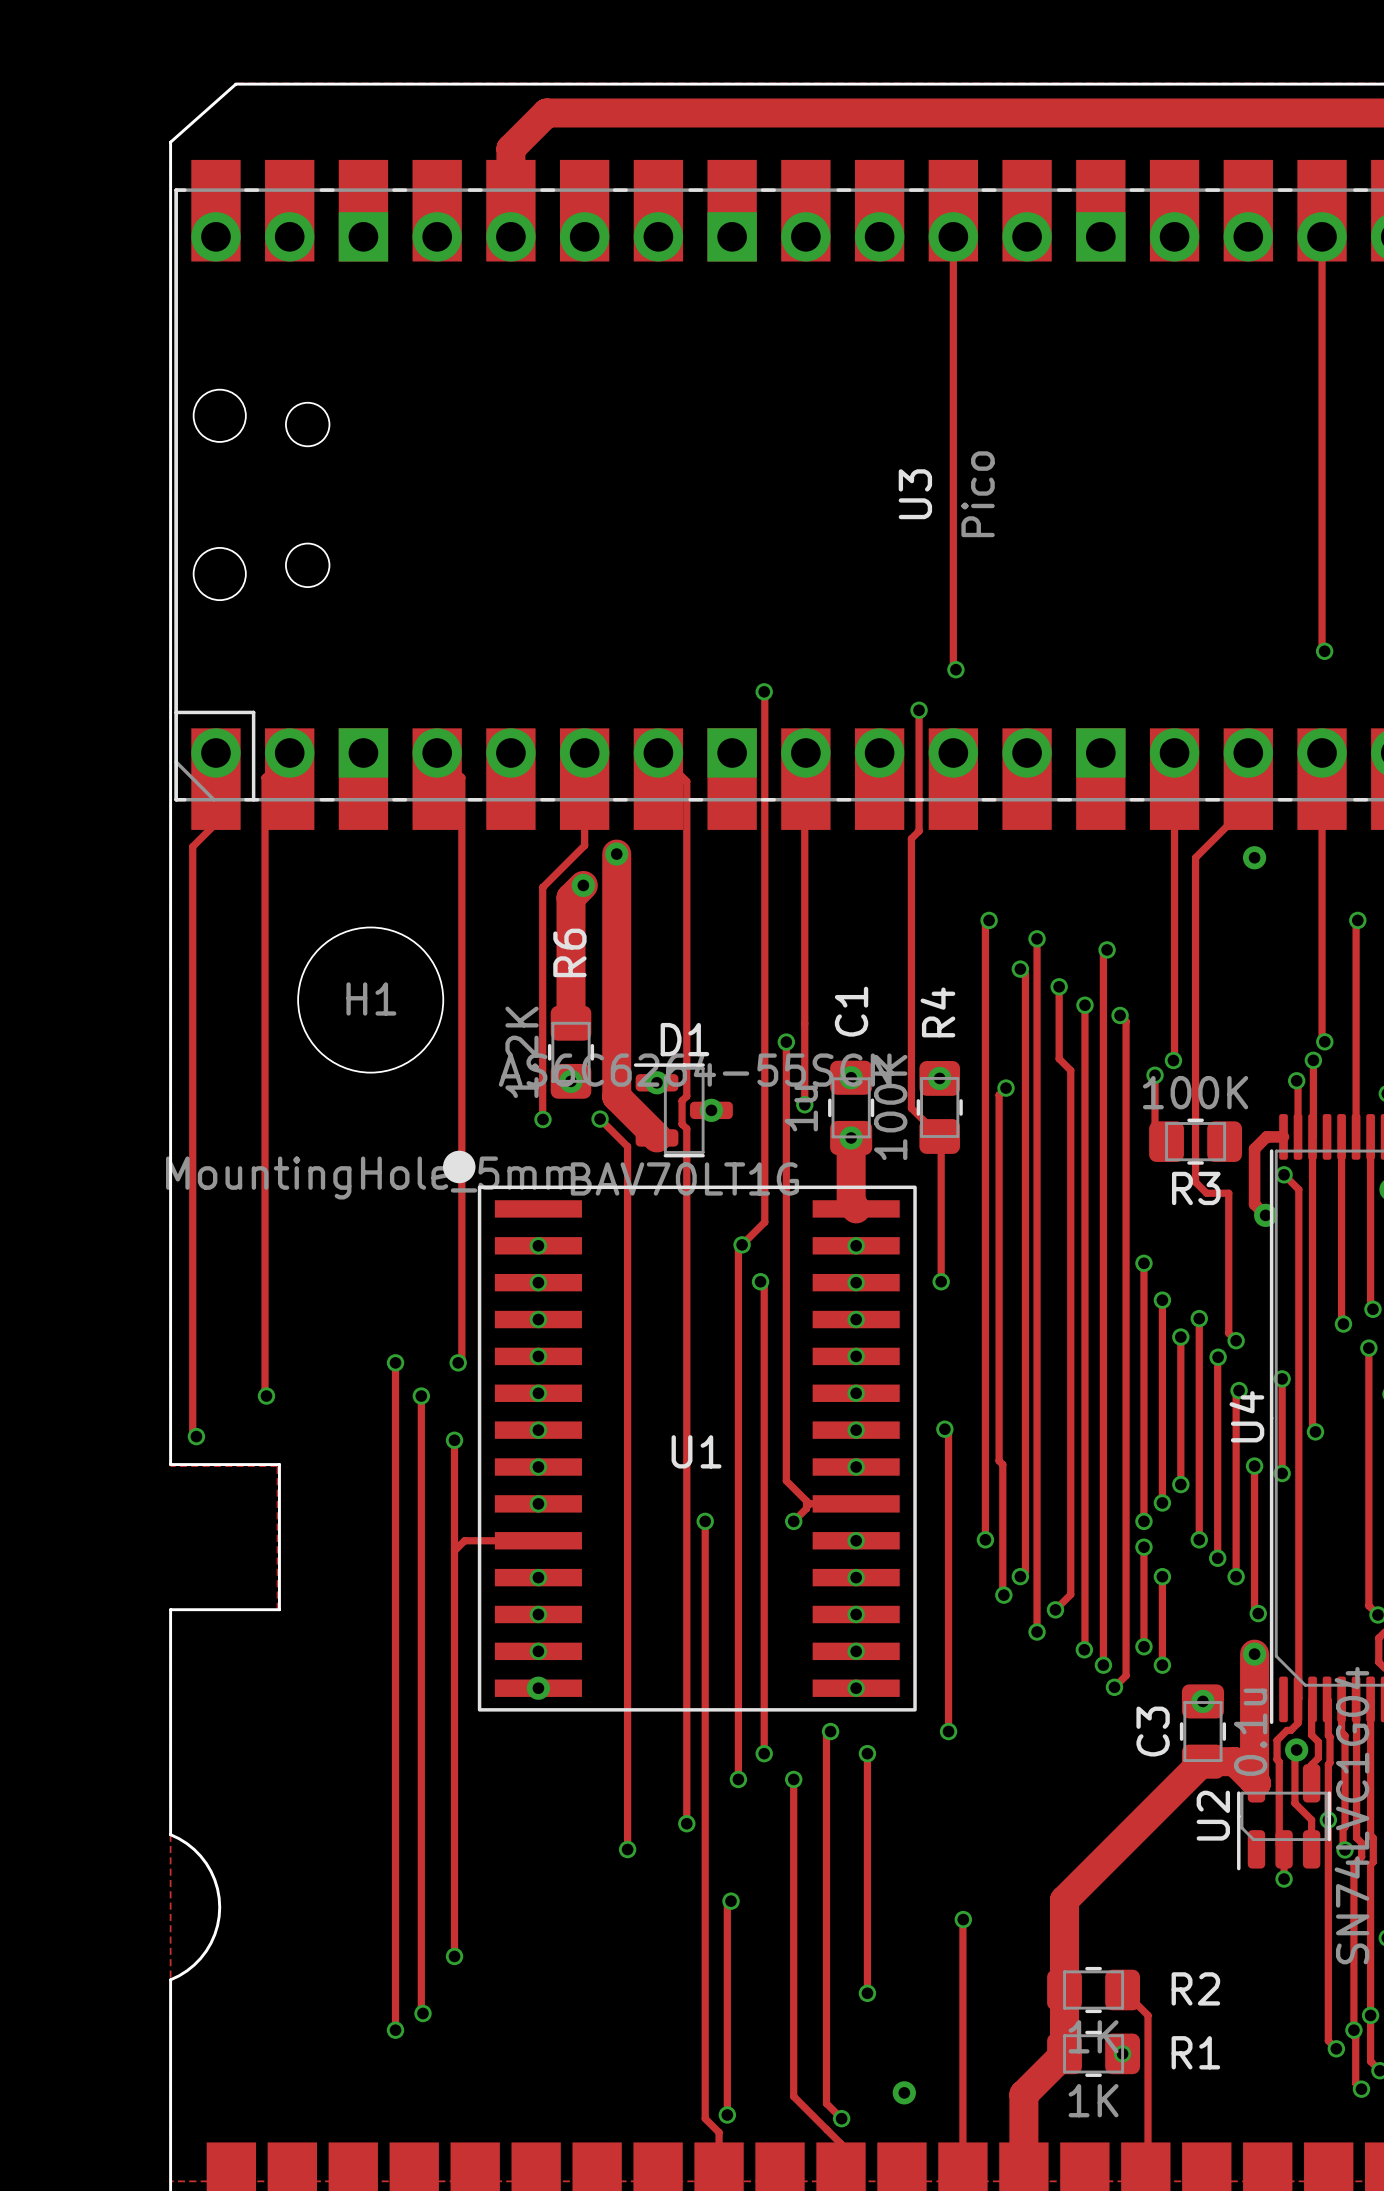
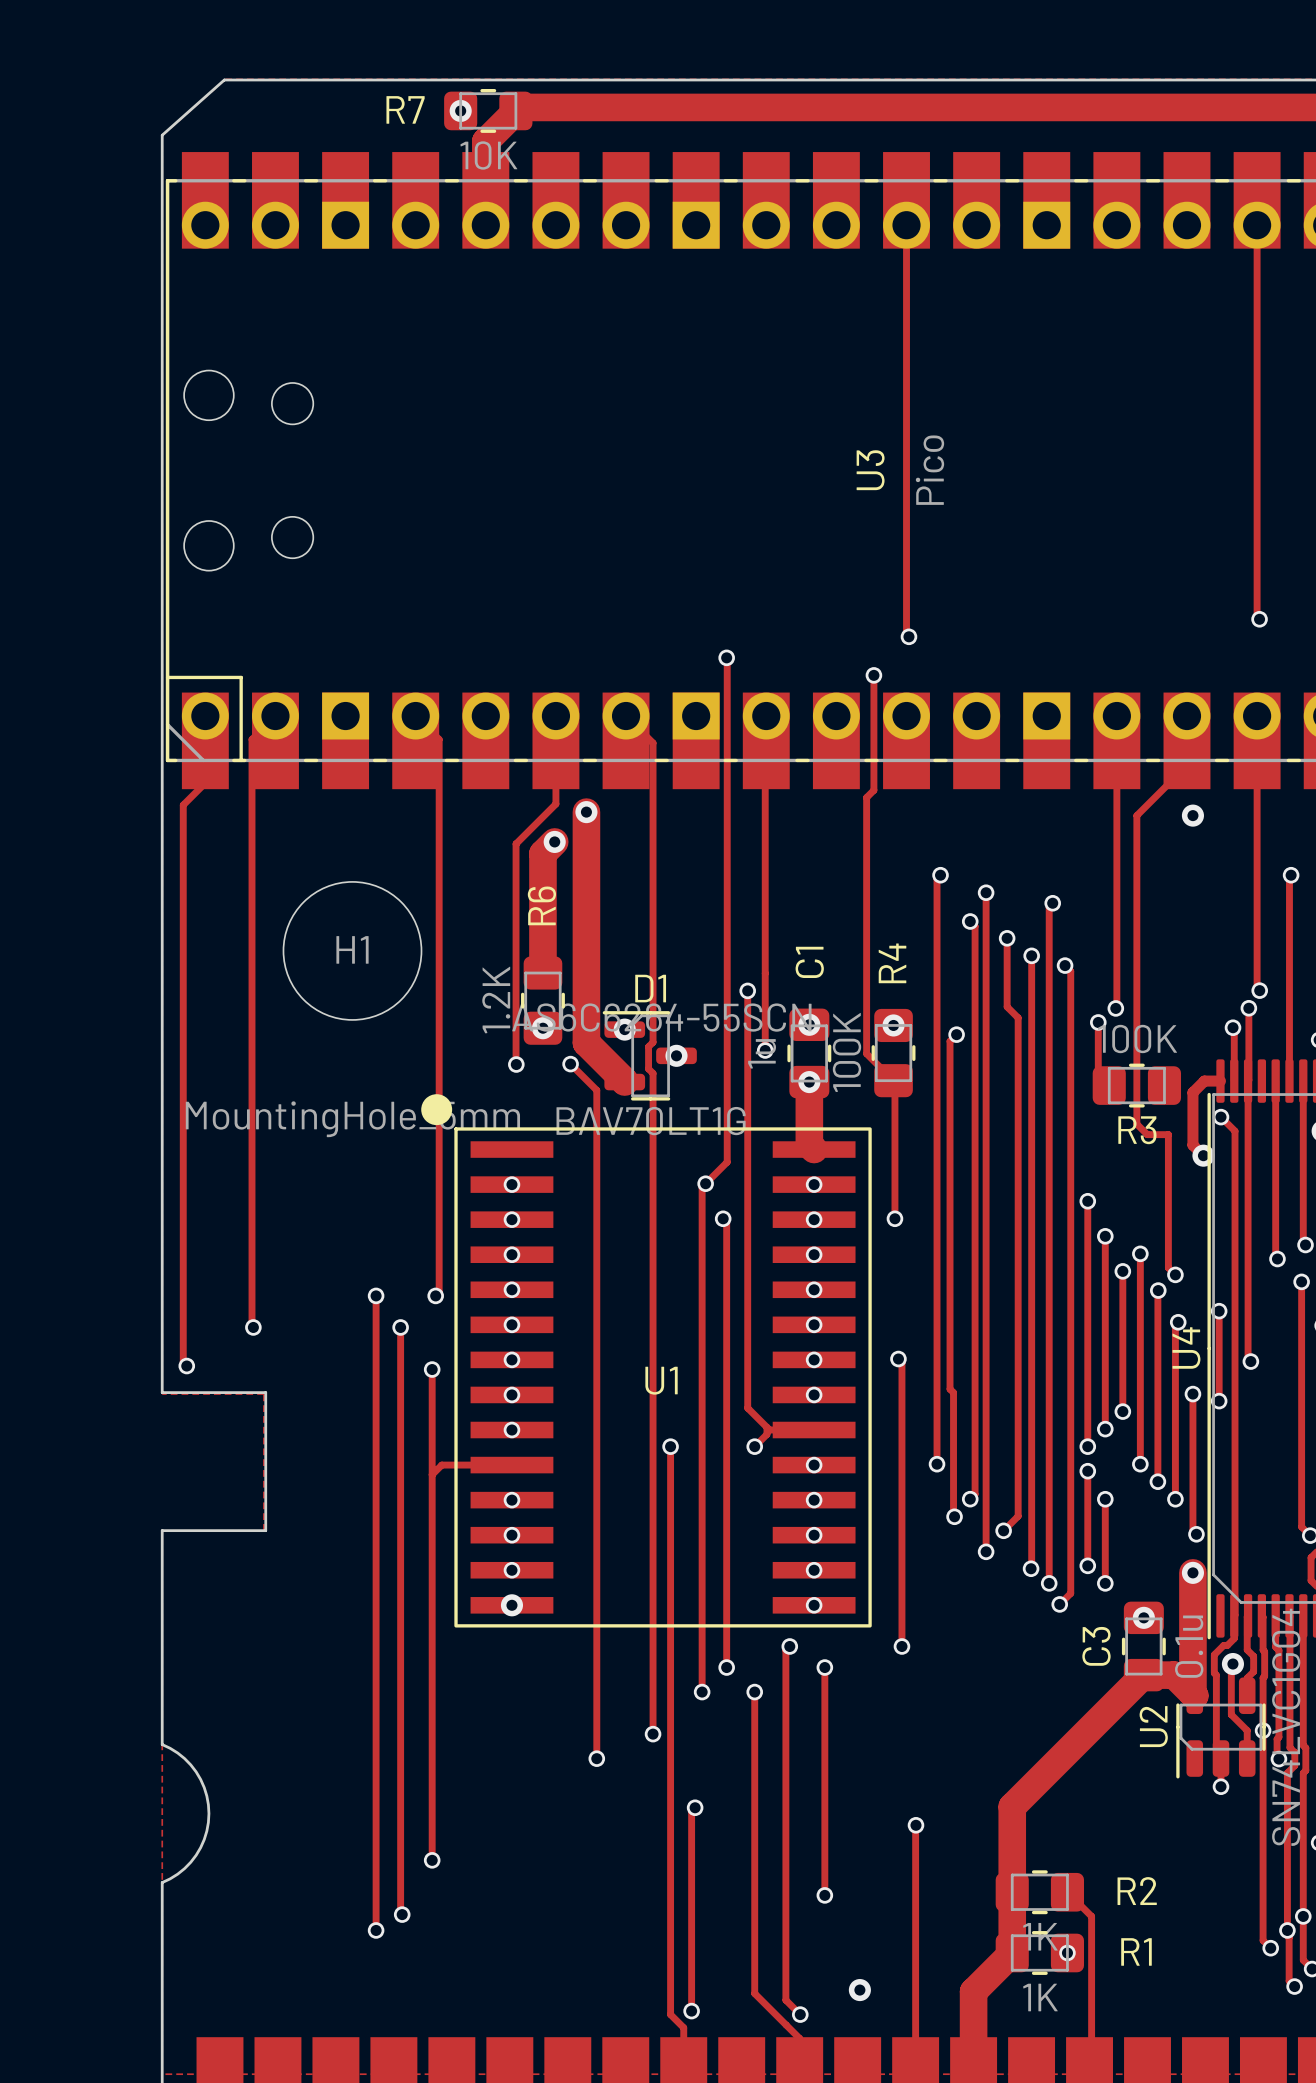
via: none -> (460, 110)
R7: none -> 10K (488, 110)

